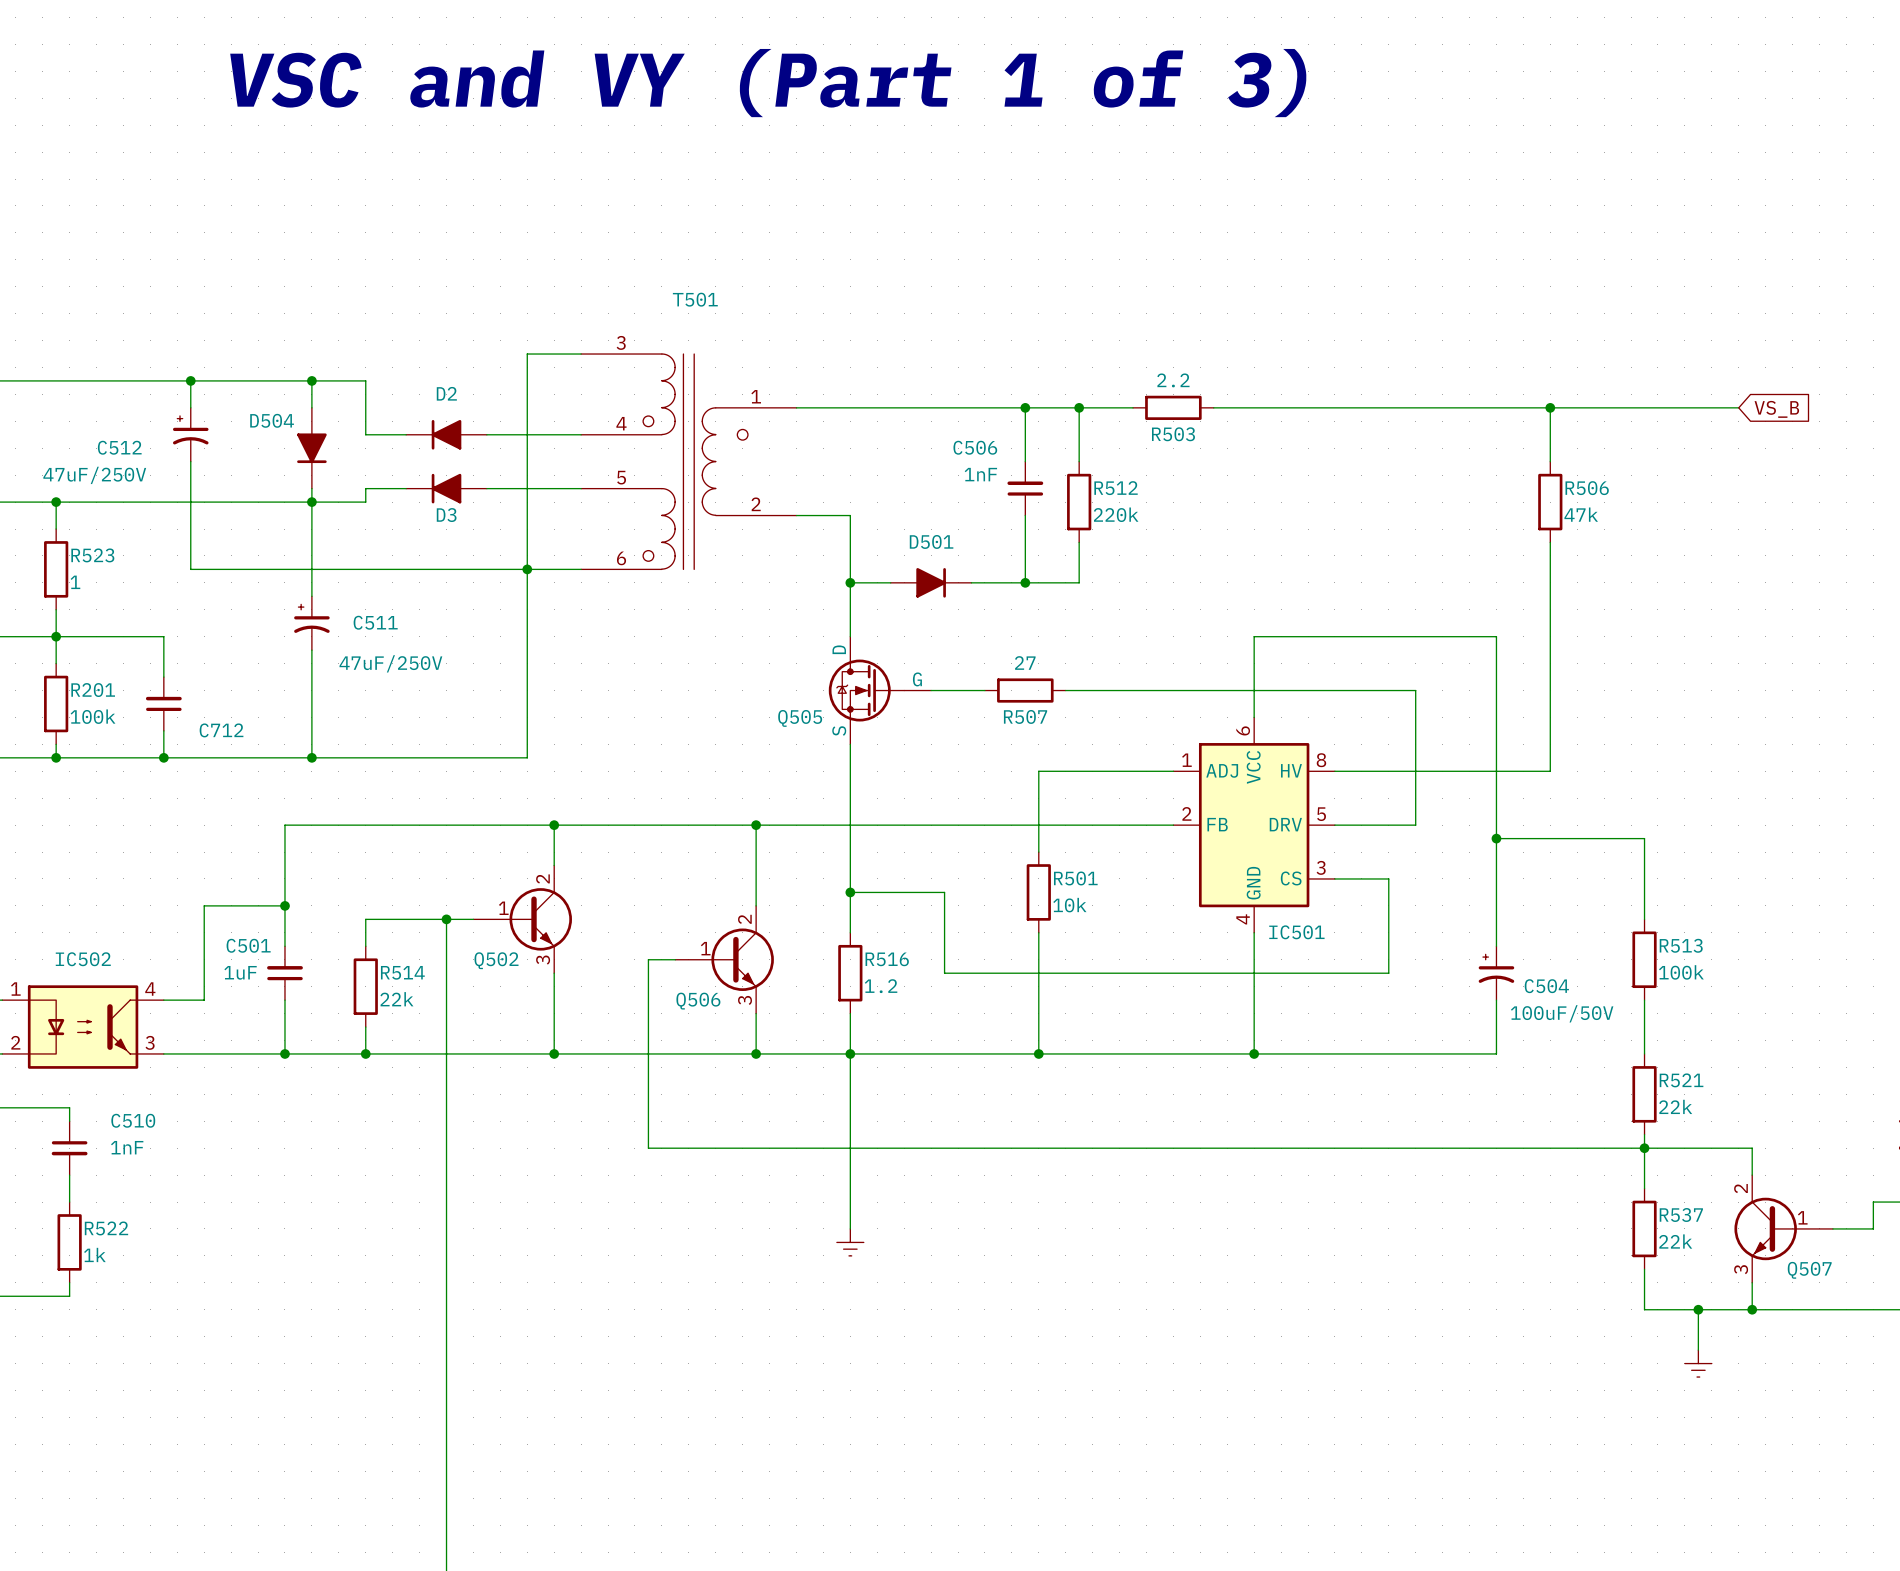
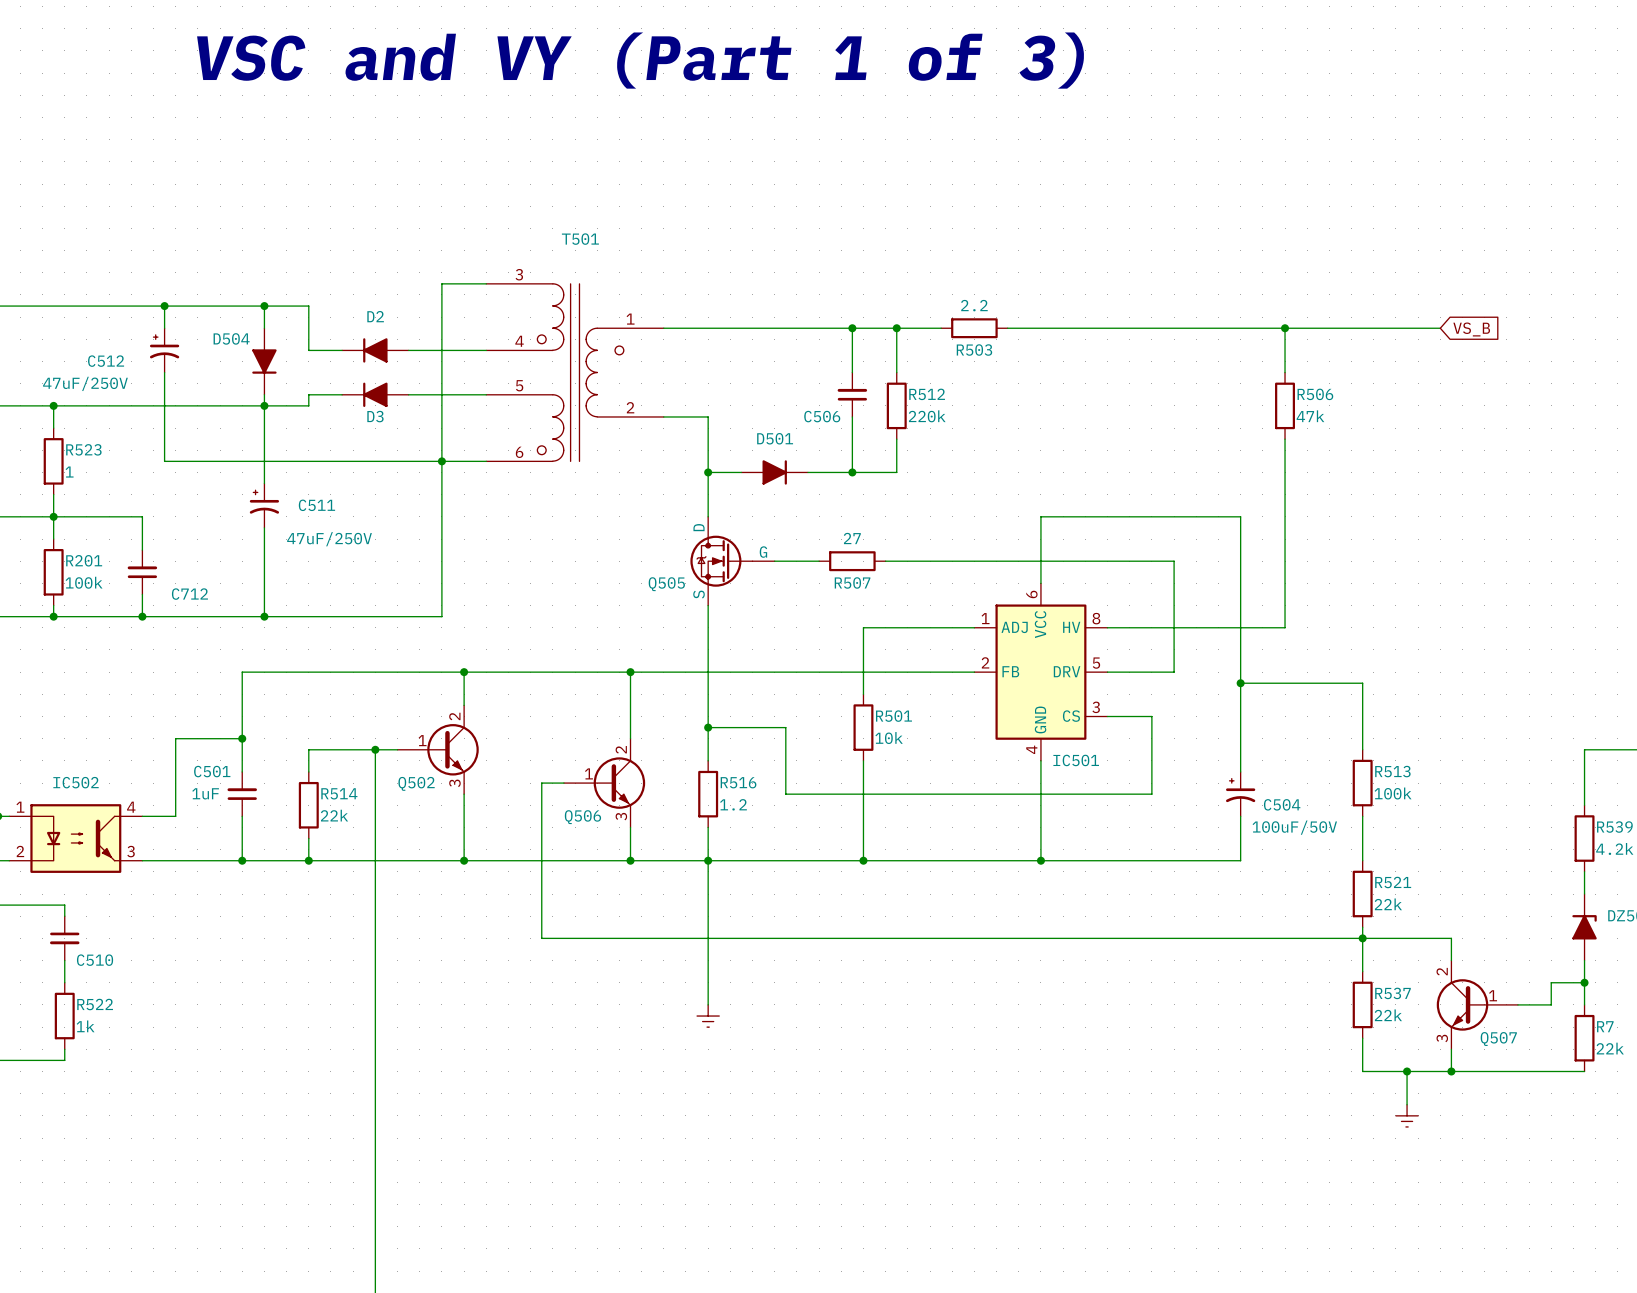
C506 name position: C506 (975, 447) -> C506 (822, 416)
C506 value: 1nF (980, 474) -> none
C510 name position: C510 (133, 1120) -> C510 (95, 960)
C510 value: 1nF (127, 1147) -> none

